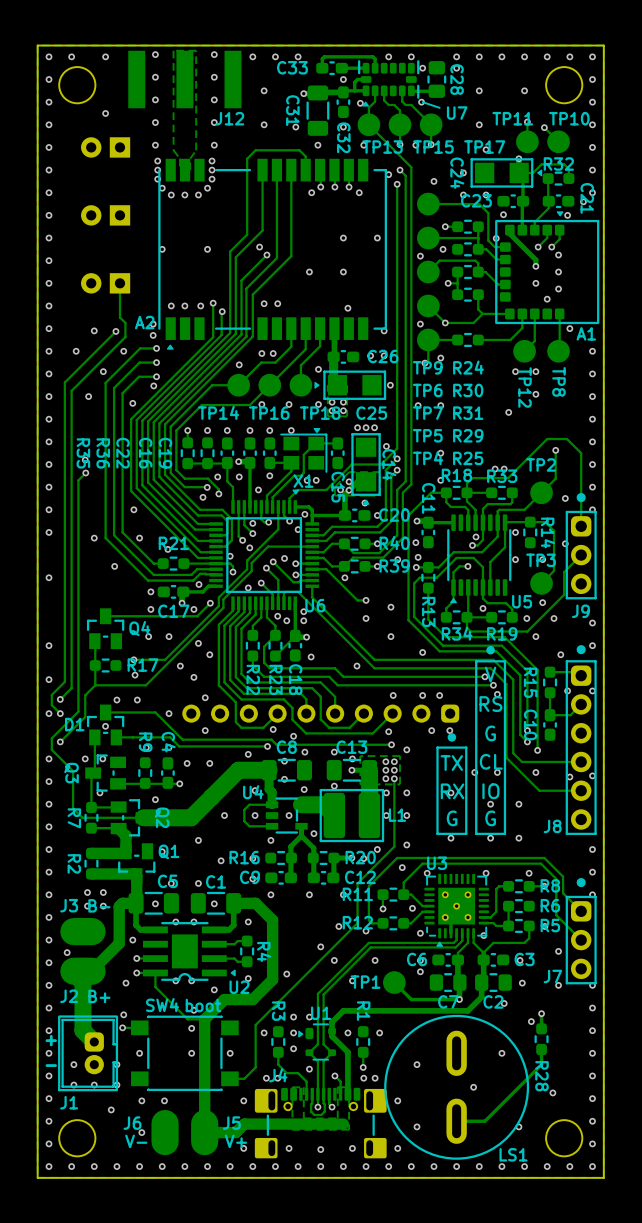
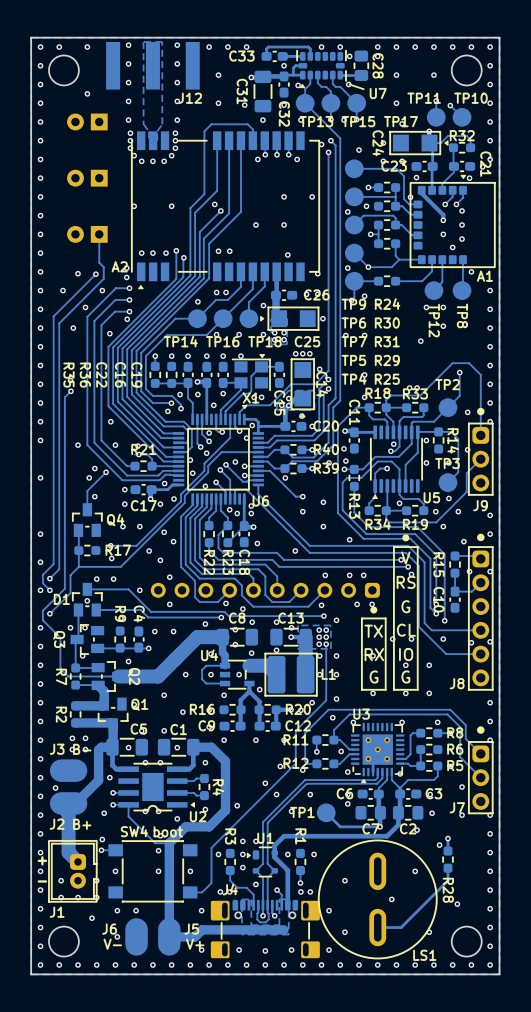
via: none -> (137, 446)
track: none -> (135, 454) (147, 454) (152, 459) (152, 466)
track: (216, 563) (230, 563) (233, 566) (233, 572) -> none
via: none -> (106, 472)
via: none -> (89, 477)
via: none -> (94, 496)
track: (210, 603) (197, 616) (105, 616) -> (106, 472) (87, 491) (87, 509)

